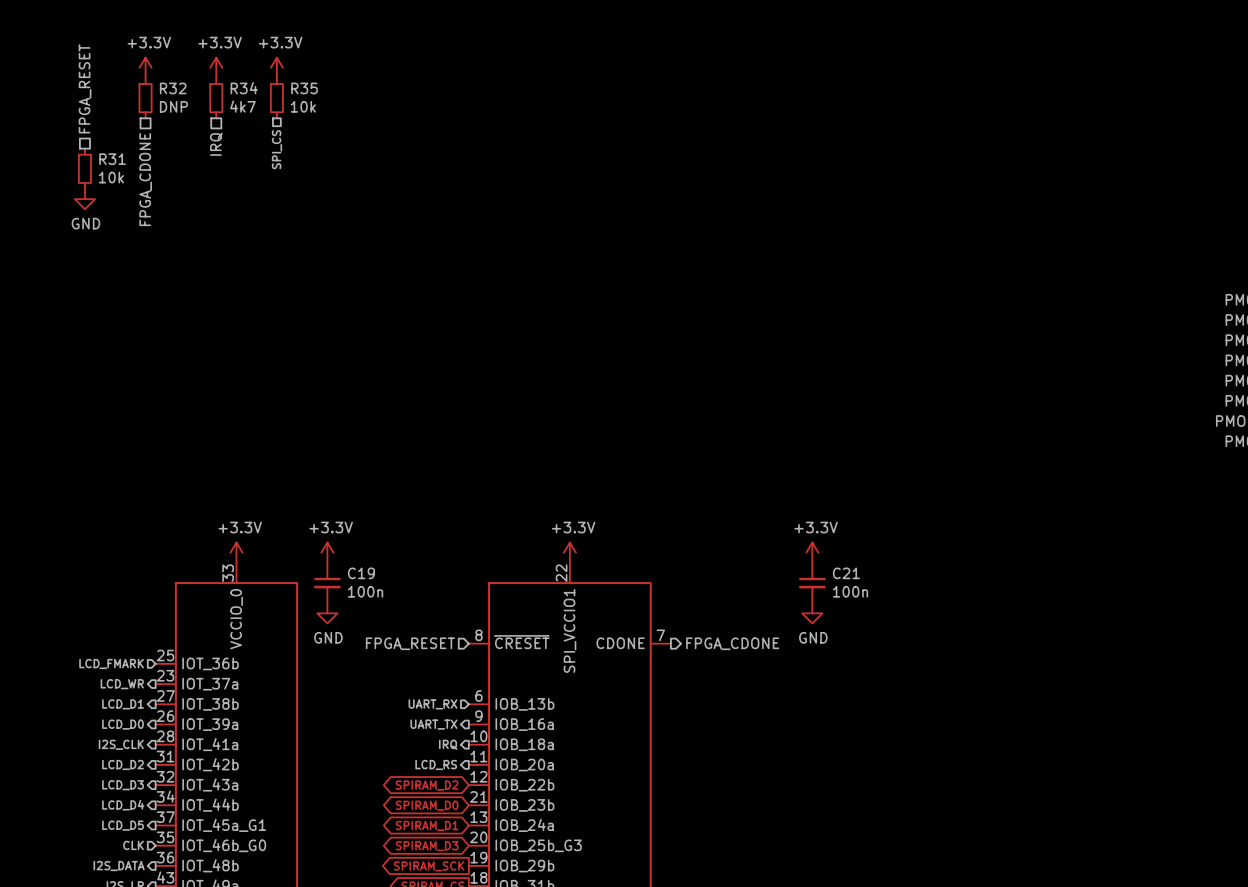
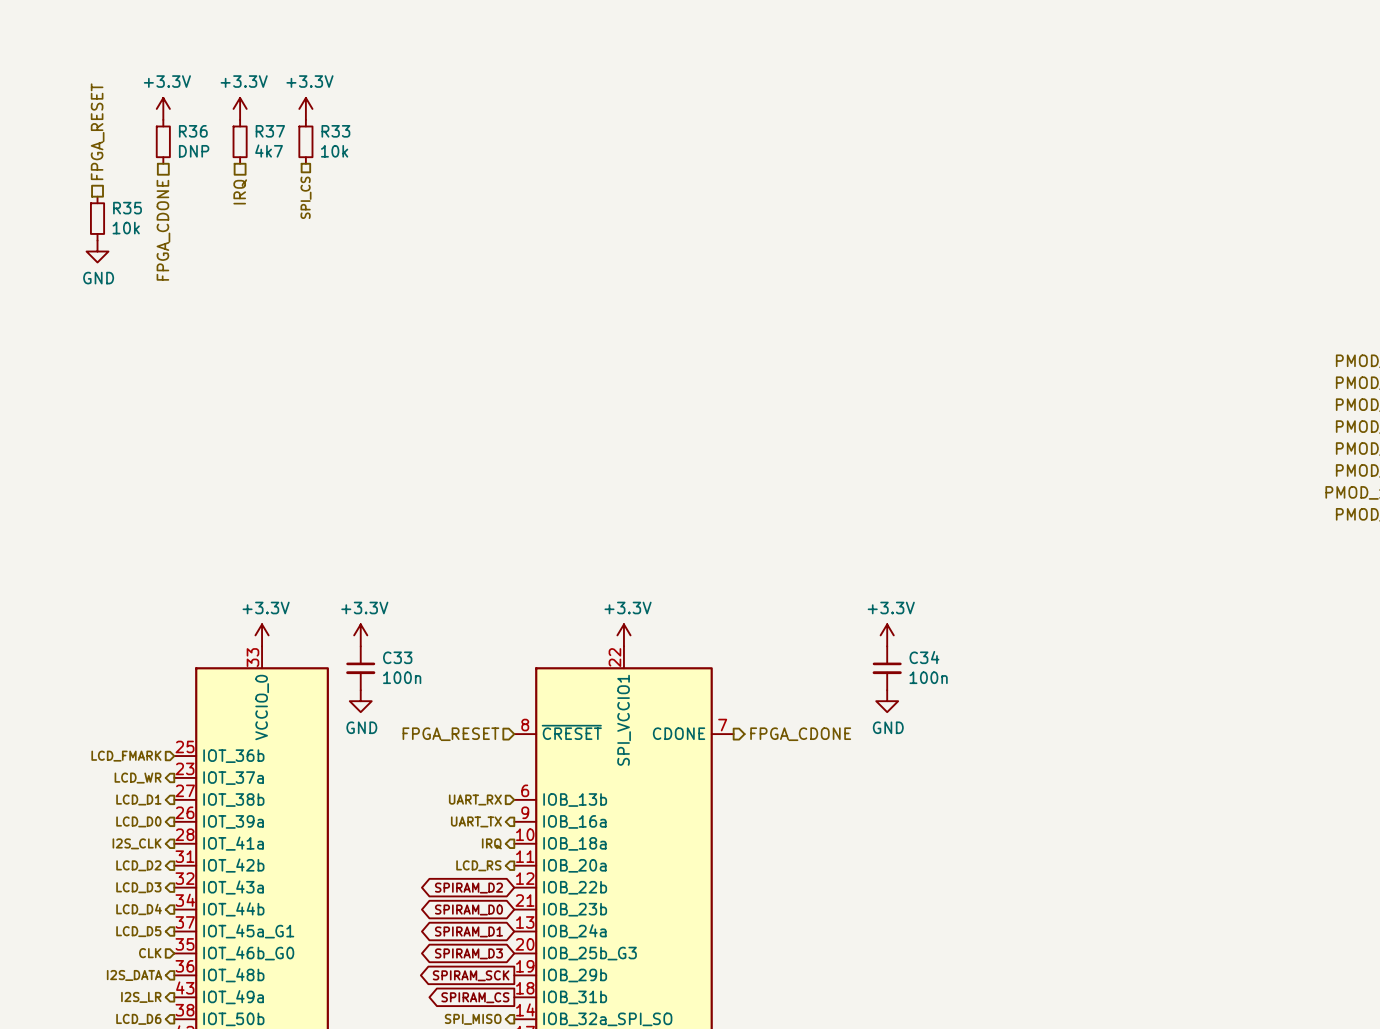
R32 name: R32 (173, 88) -> R36 (193, 131)
R34 name: R34 (244, 88) -> R37 (270, 131)
R35 name: R35 (304, 88) -> R33 (335, 131)
R31 name: R31 (112, 159) -> R35 (127, 208)
C19 name: C19 (361, 573) -> C33 (397, 657)
C21 name: C21 (846, 573) -> C34 (924, 657)

